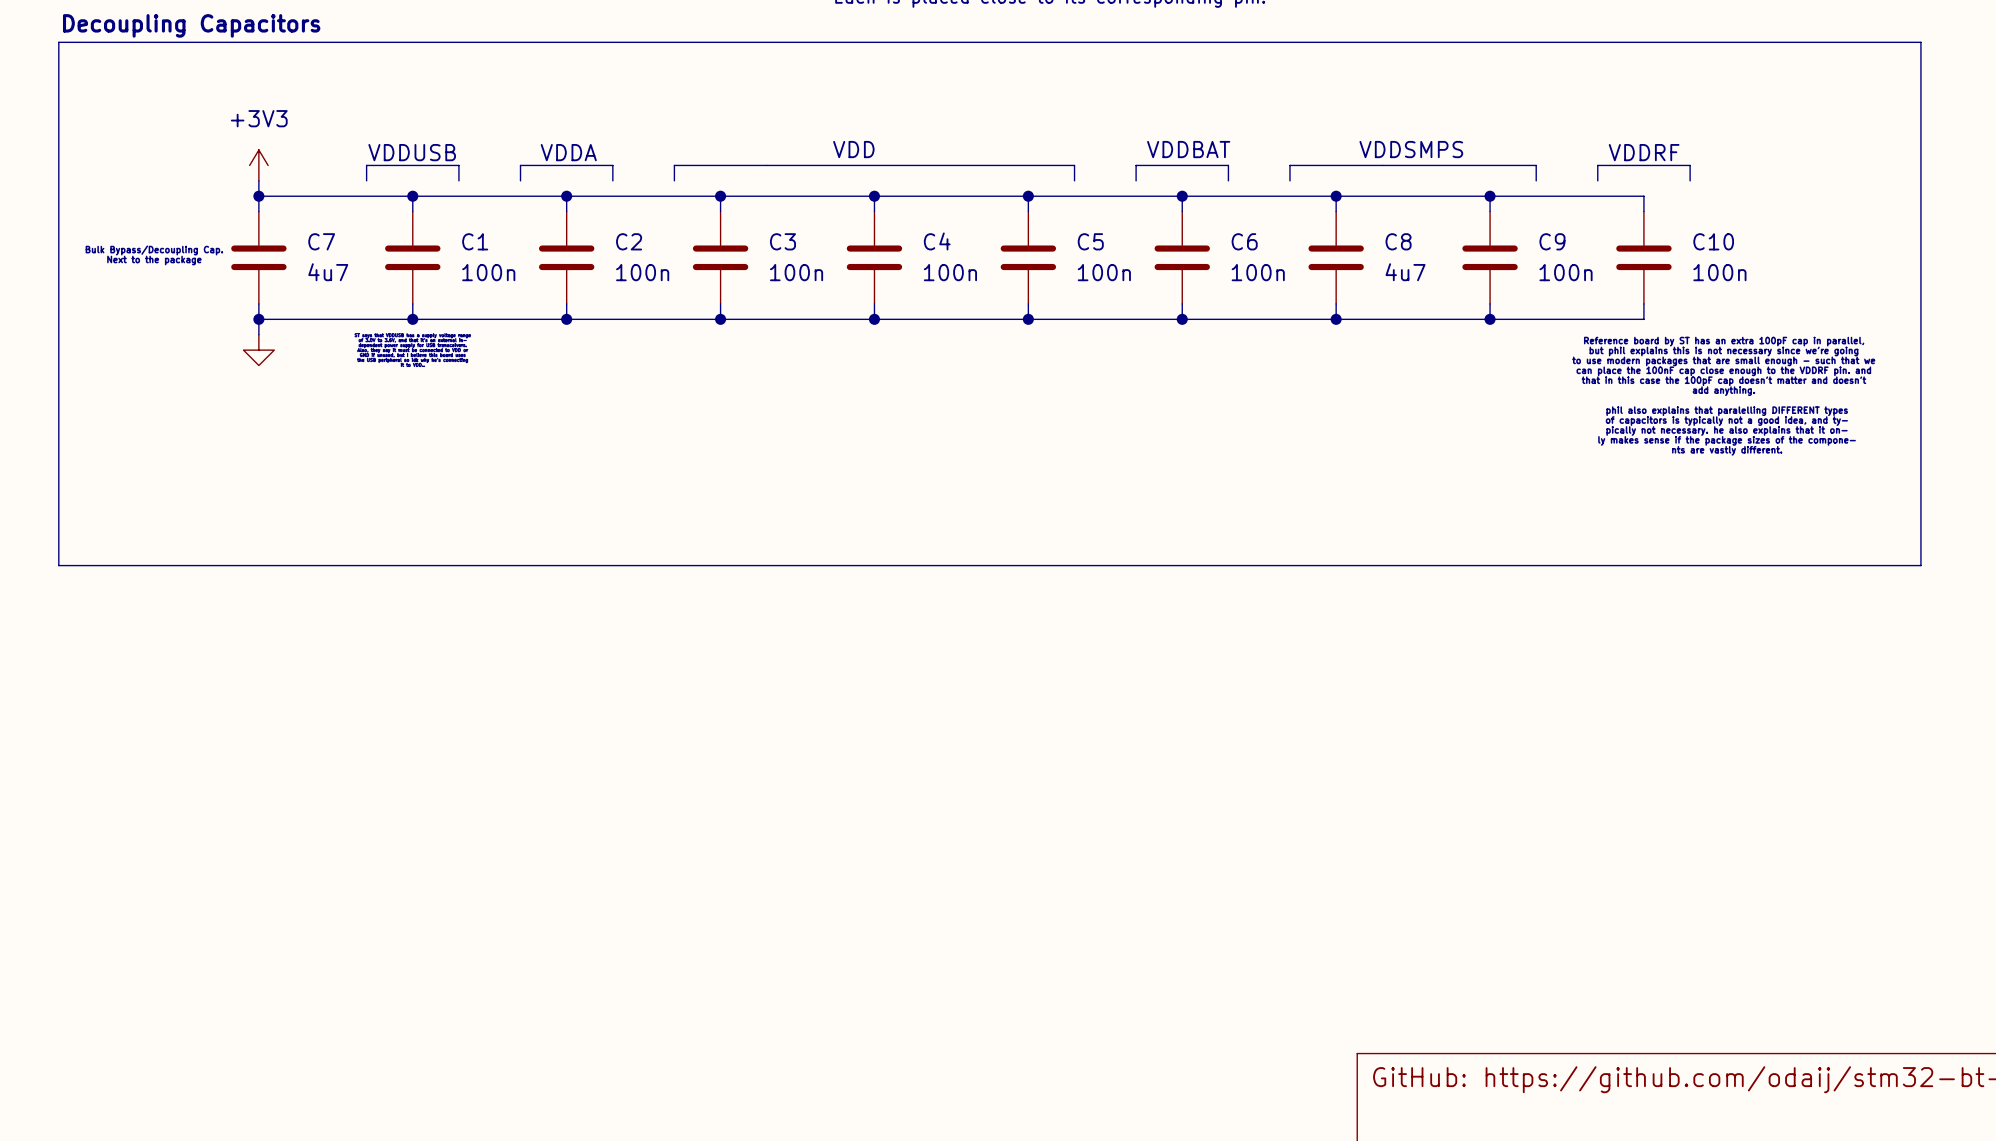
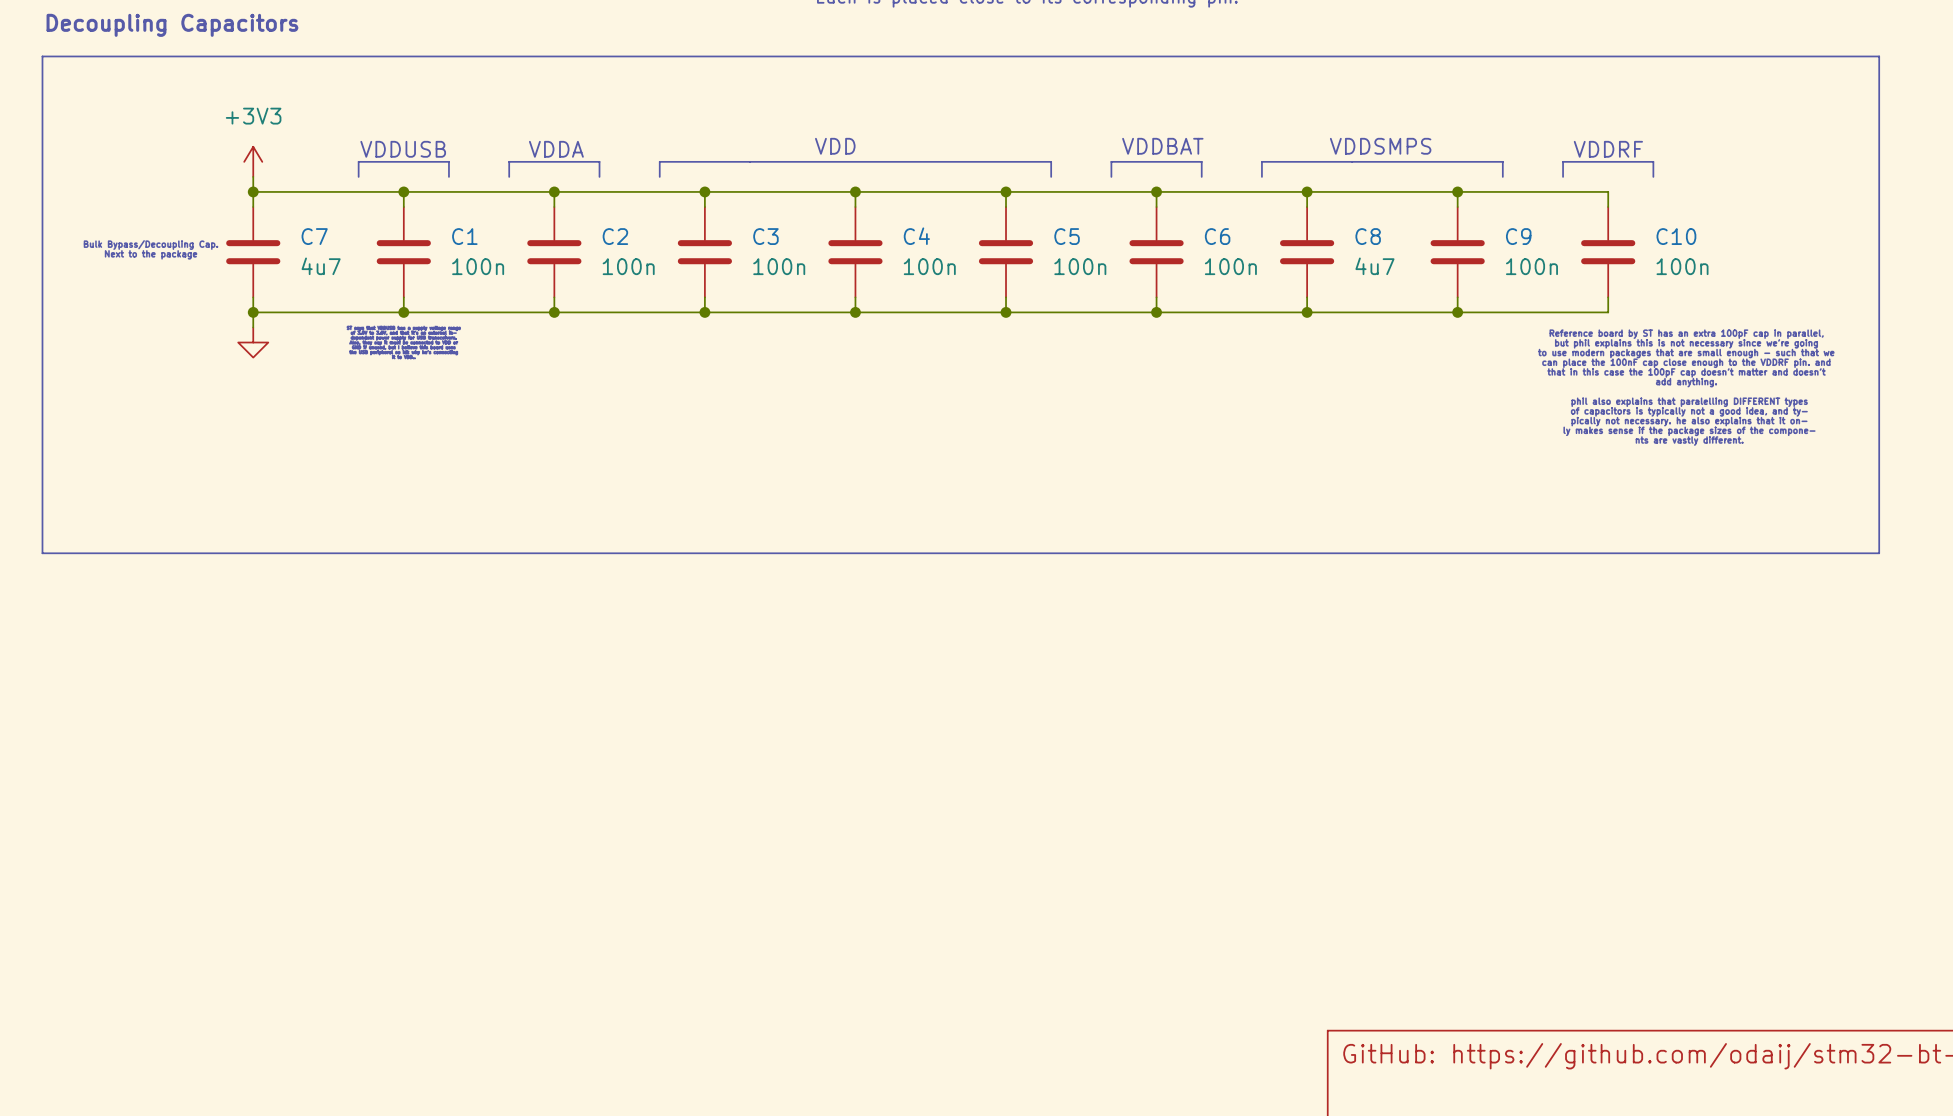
text position: Decoupling Capacitors (191, 25) -> Decoupling Capacitors (172, 25)
line: (1920, 57) (1920, 42) (58, 42) (58, 565) -> (1879, 56) (42, 56) (42, 553) (57, 553)

